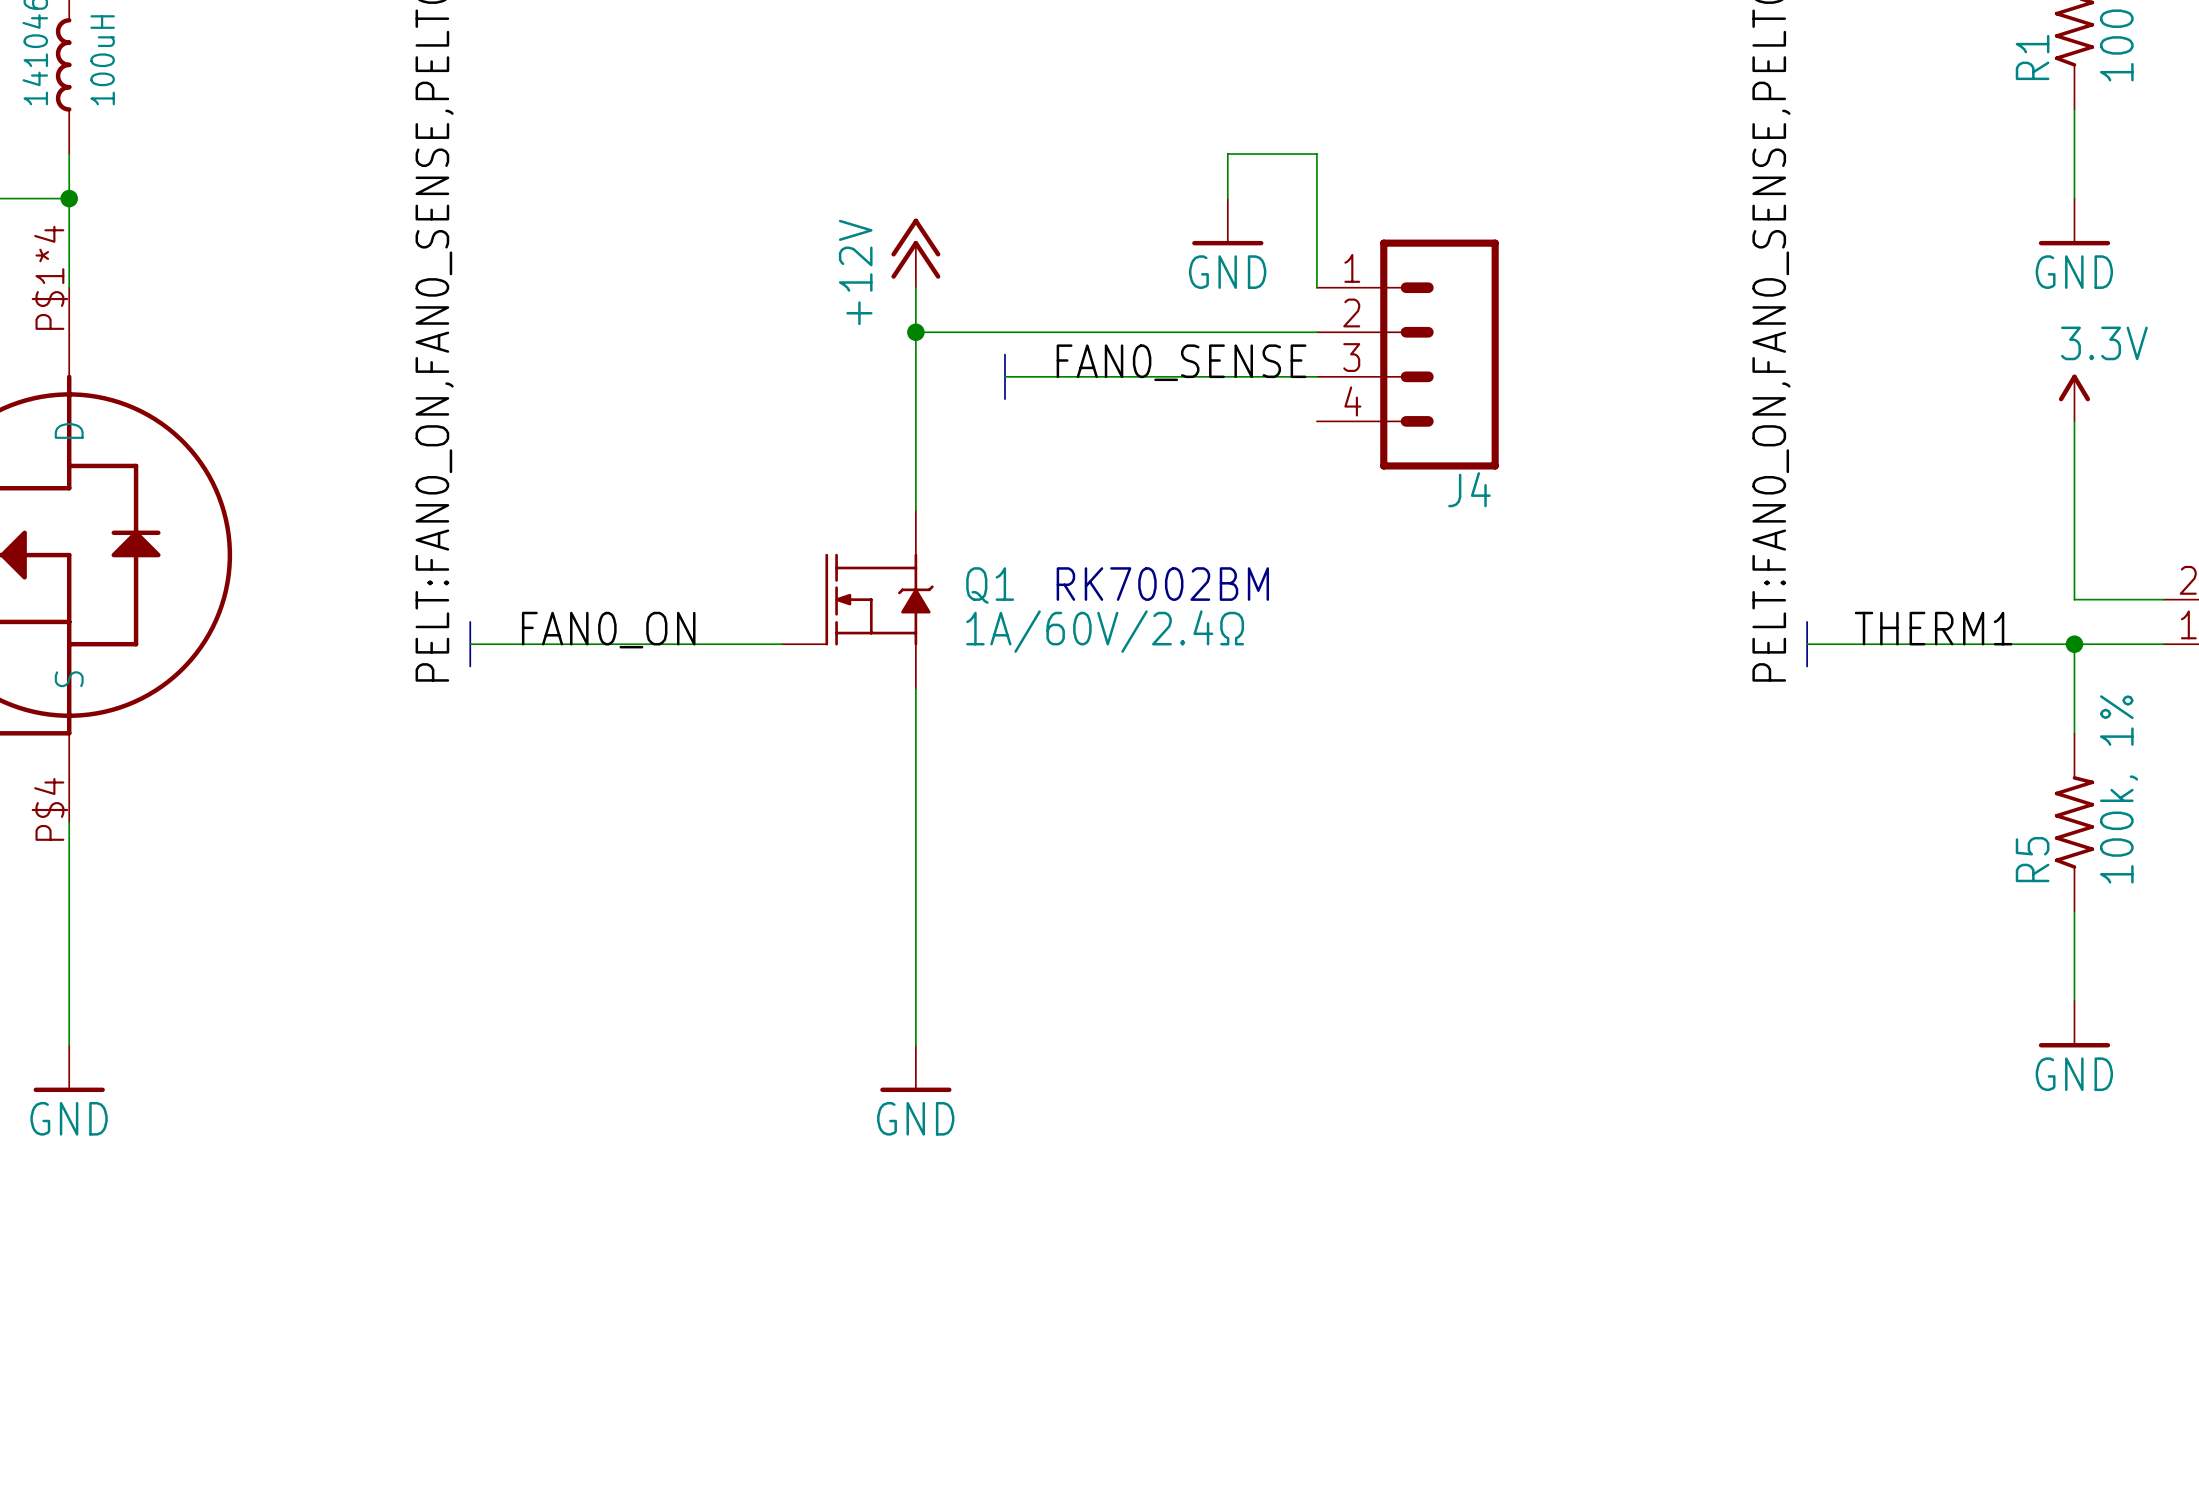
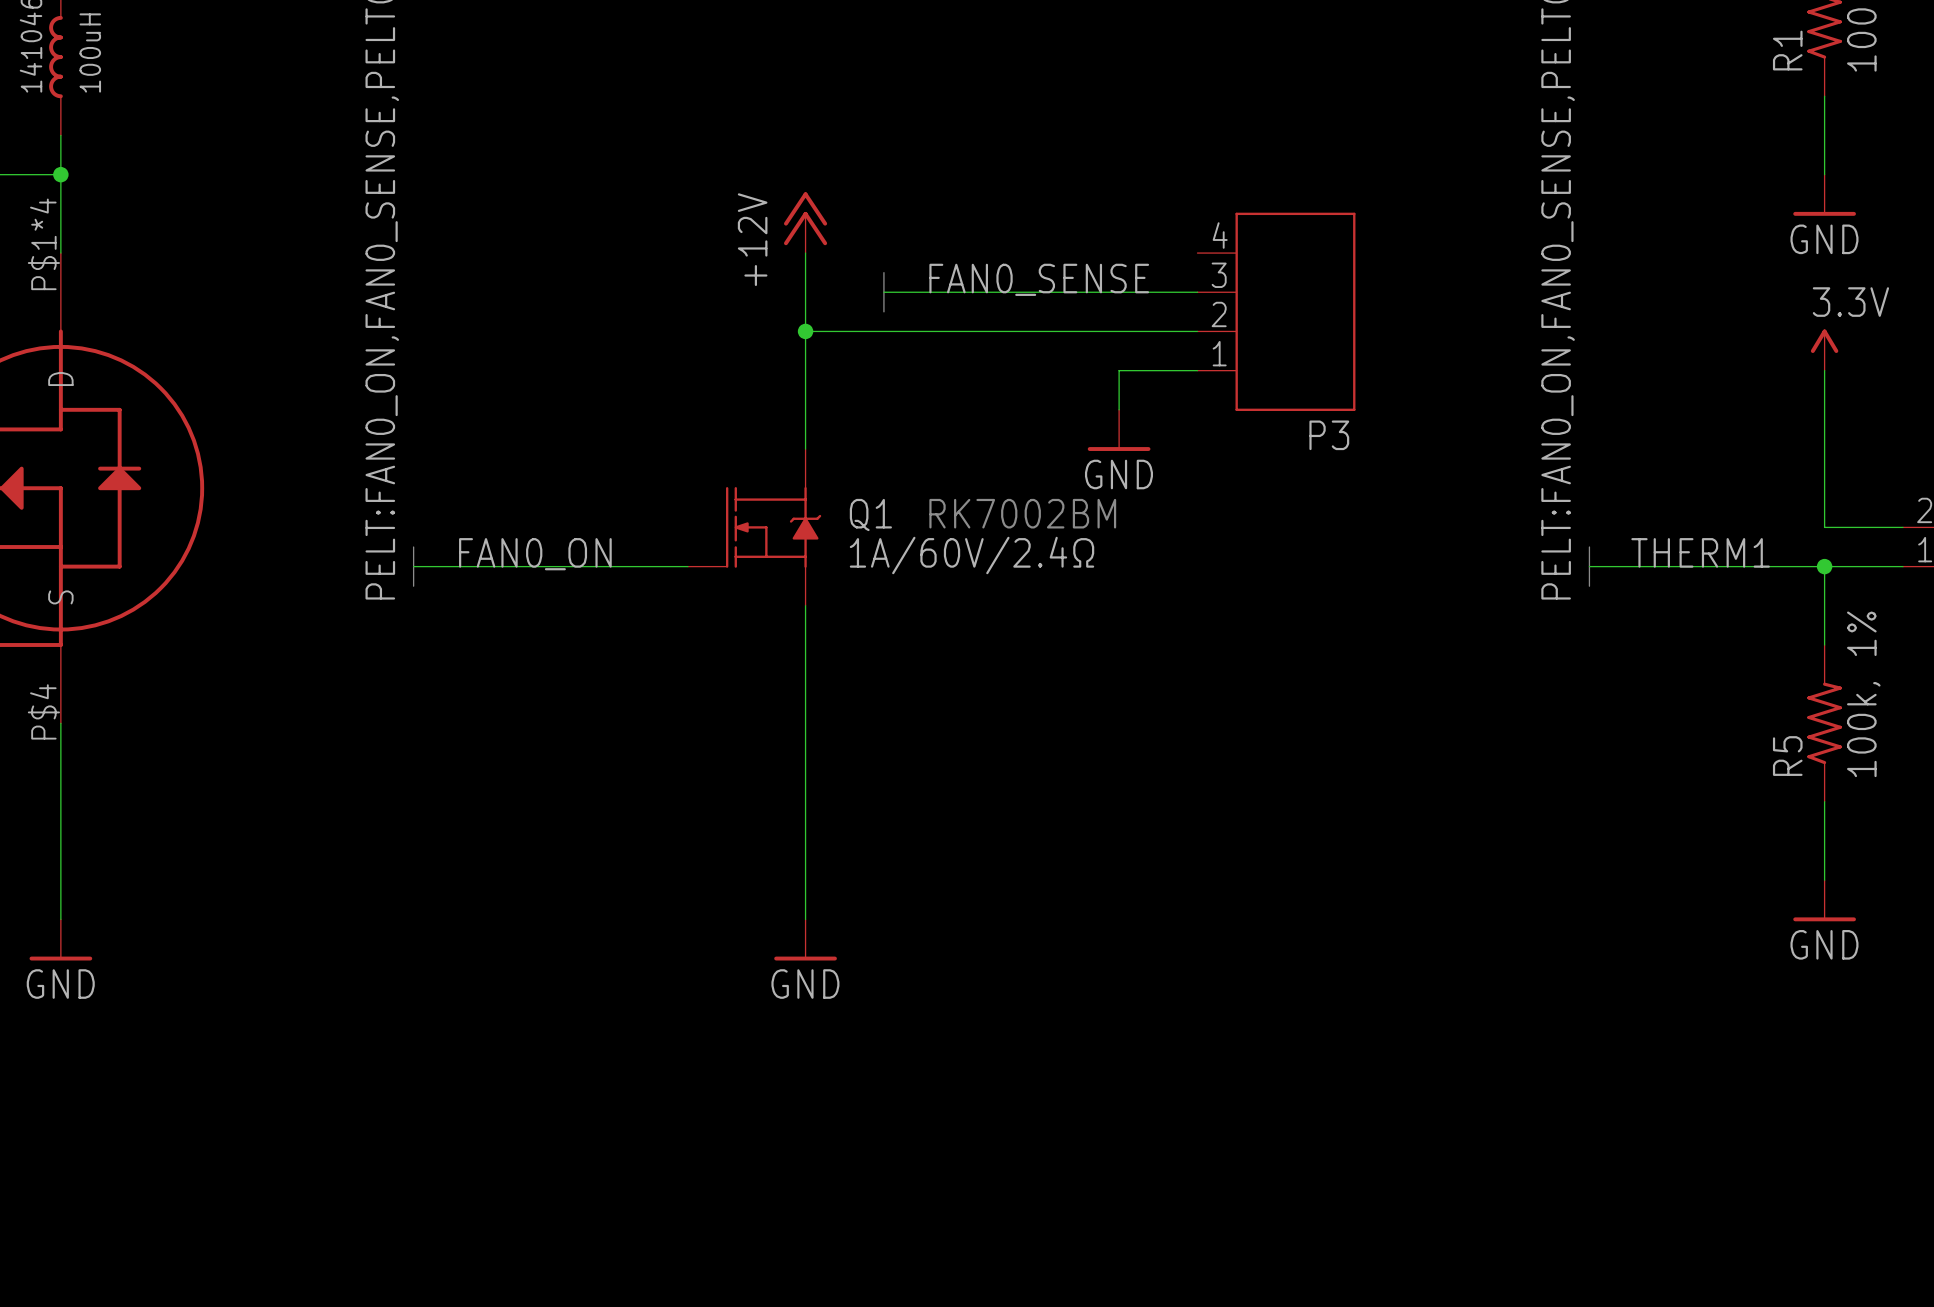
wire: (1227, 198) (1227, 154) (1316, 154) (1316, 287) -> none
power symbol position: GND (1227, 221) -> GND (1119, 430)
wire: (915, 332) (1005, 332) -> (805, 331) (883, 331)
junction position: (915, 332) -> (805, 331)
bus: (1005, 354) (1005, 399) -> (883, 311) (883, 272)
J4: (1407, 354) -> none
P3: none -> (1276, 311)
label position: FAN0_SENSE (1181, 362) -> FAN0_SENSE (1039, 279)
wire: none -> (1197, 370) (1119, 370) (1119, 409)

